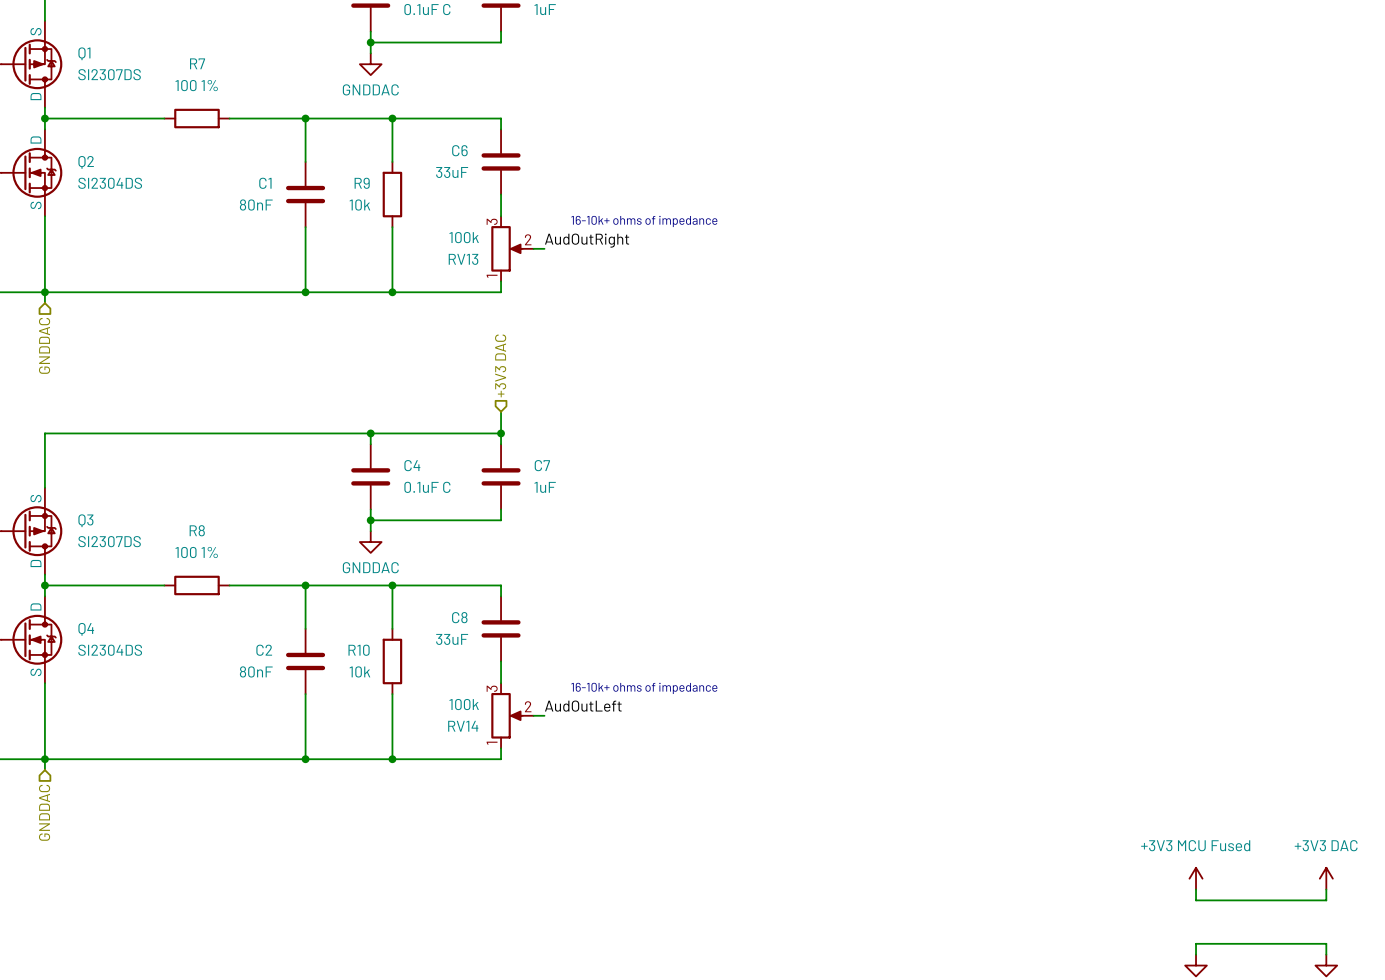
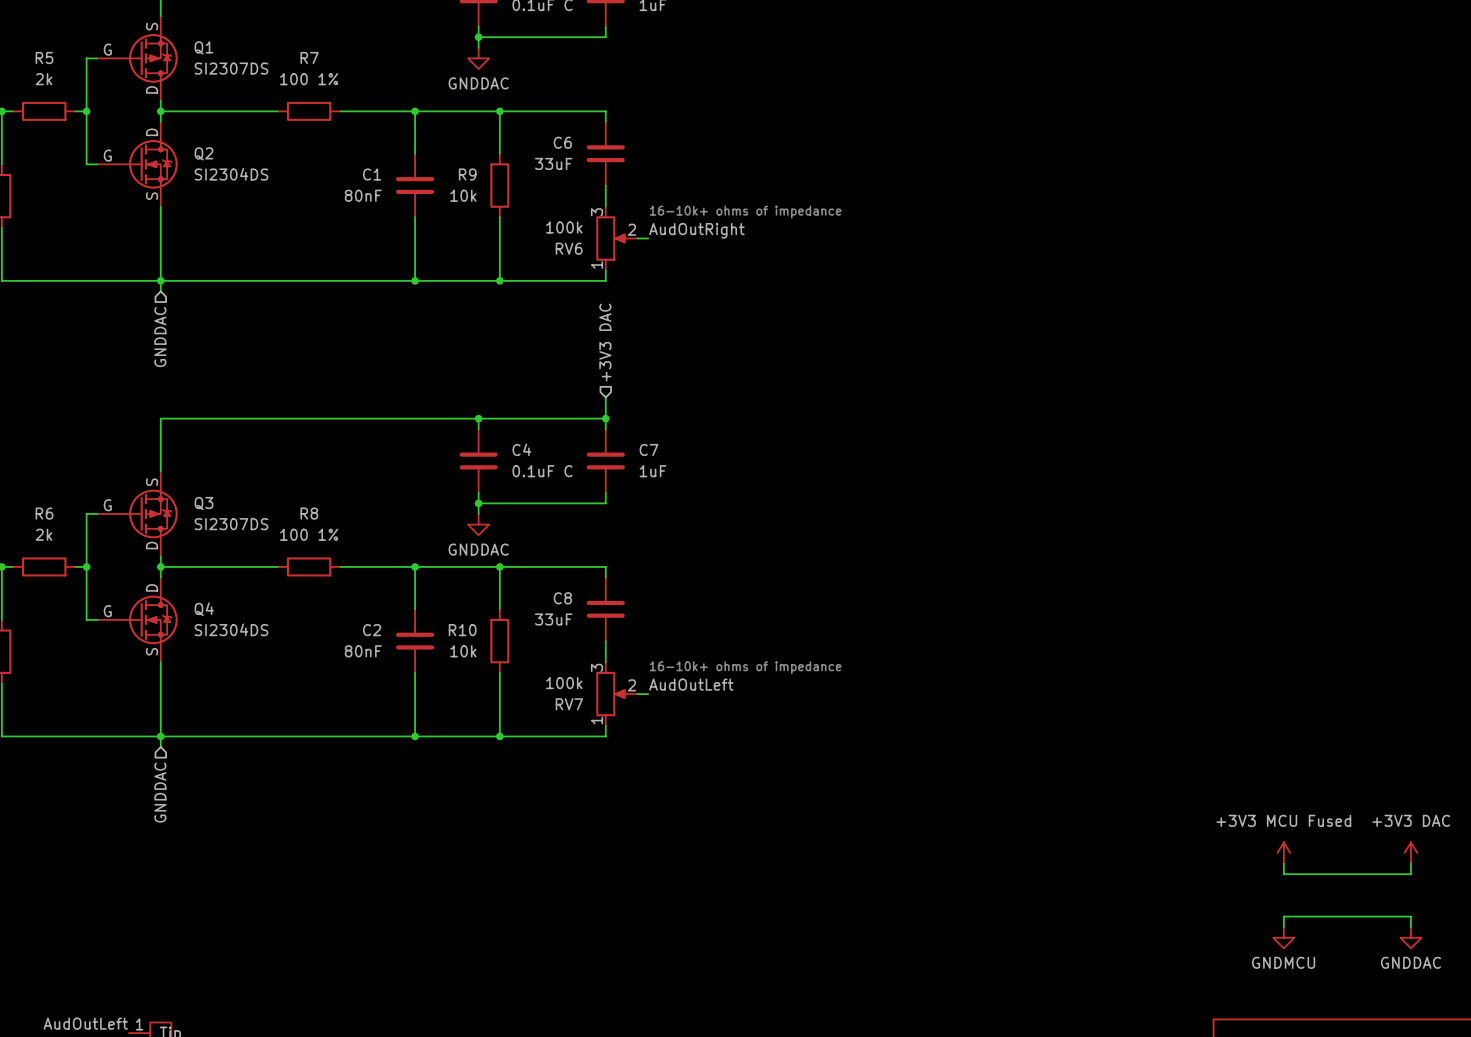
RV13 name: RV13 (463, 259) -> RV6 (569, 248)
RV14 name: RV14 (463, 726) -> RV7 (569, 704)

